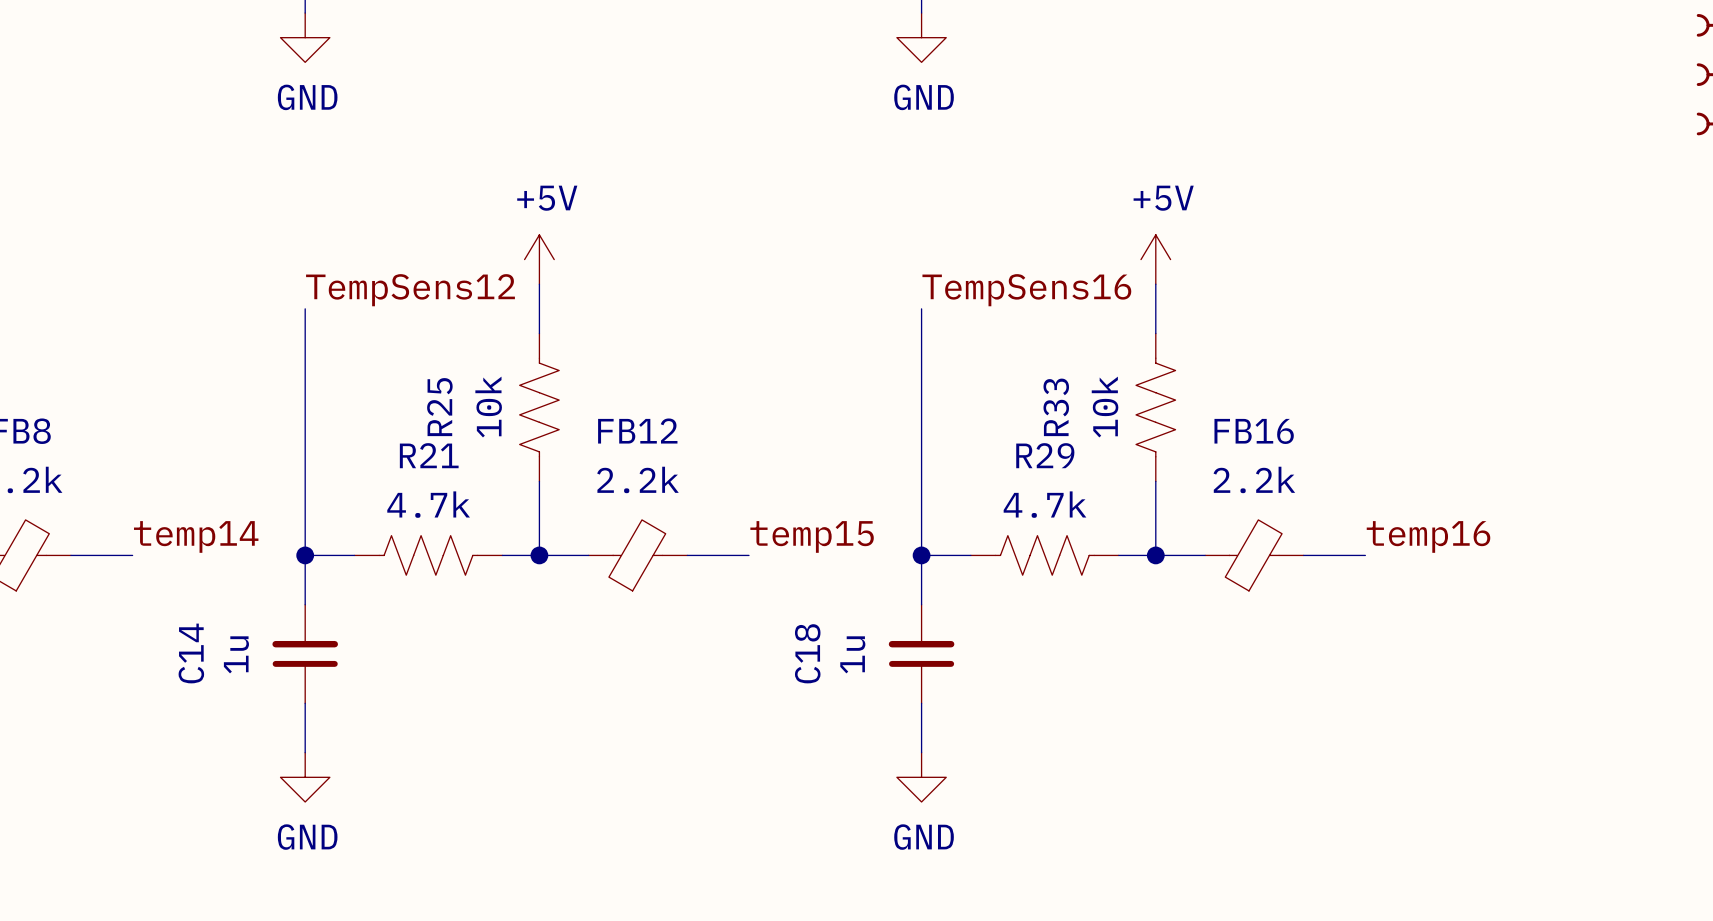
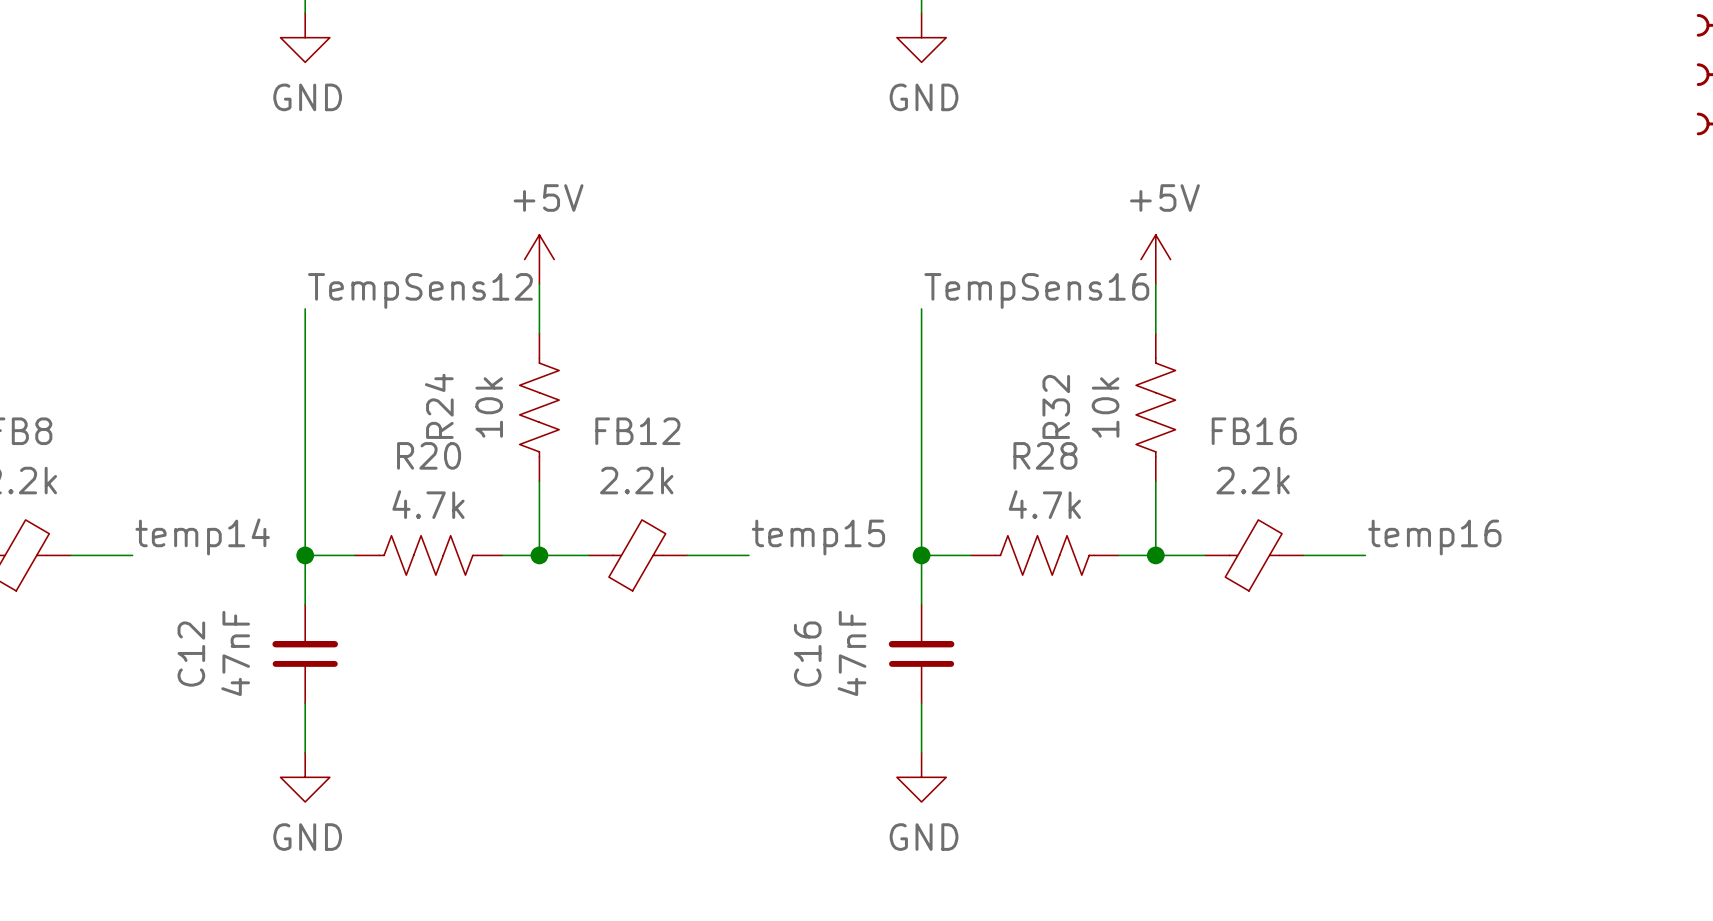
R25 name: R25 (439, 407) -> R24 (439, 406)
R33 name: R33 (1056, 407) -> R32 (1056, 406)
R21 name: R21 (429, 455) -> R20 (429, 455)
R29 name: R29 (1045, 455) -> R28 (1045, 455)
C14 name: C14 (191, 653) -> C12 (191, 654)
C18 name: C18 (807, 653) -> C16 (807, 654)
C14 value: 1u (236, 654) -> 47nF (235, 653)
C18 value: 1u (852, 654) -> 47nF (852, 653)

